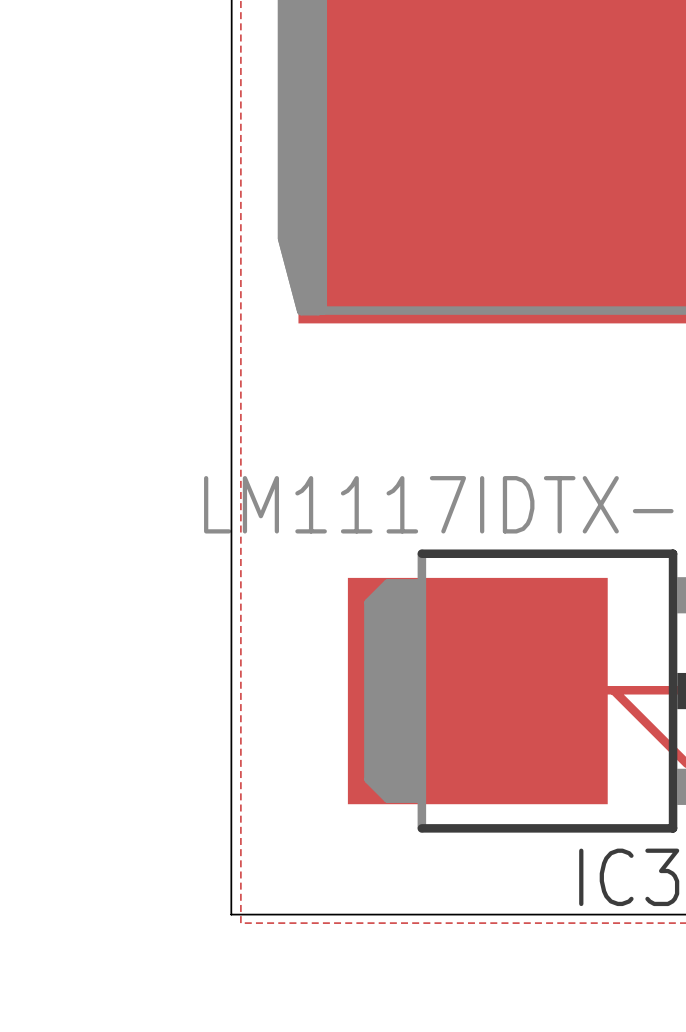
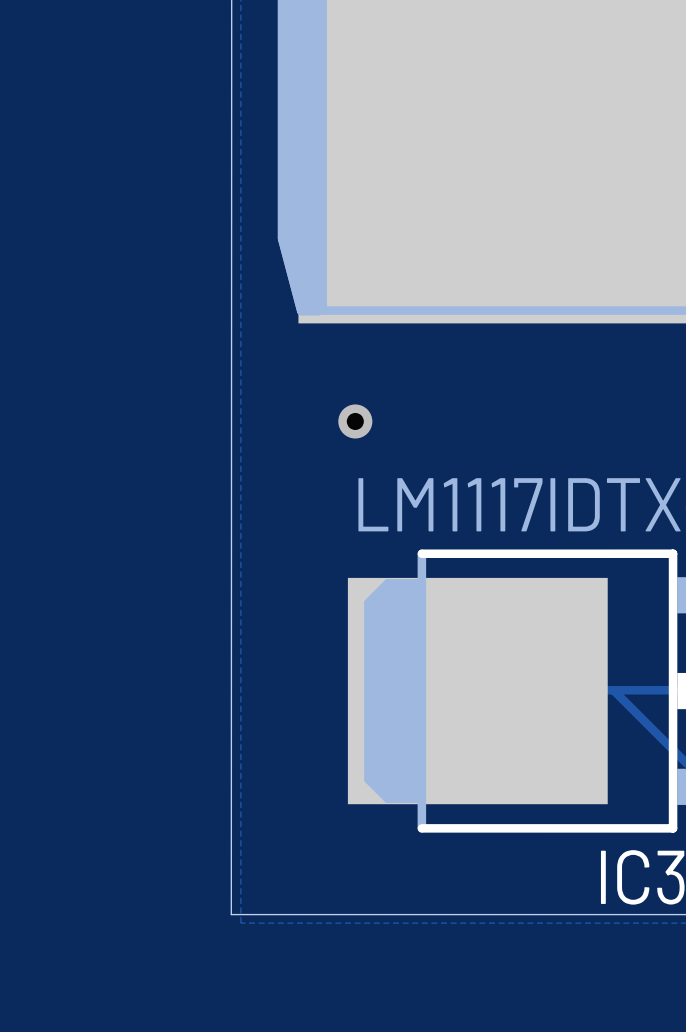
via: none -> (355, 421)

